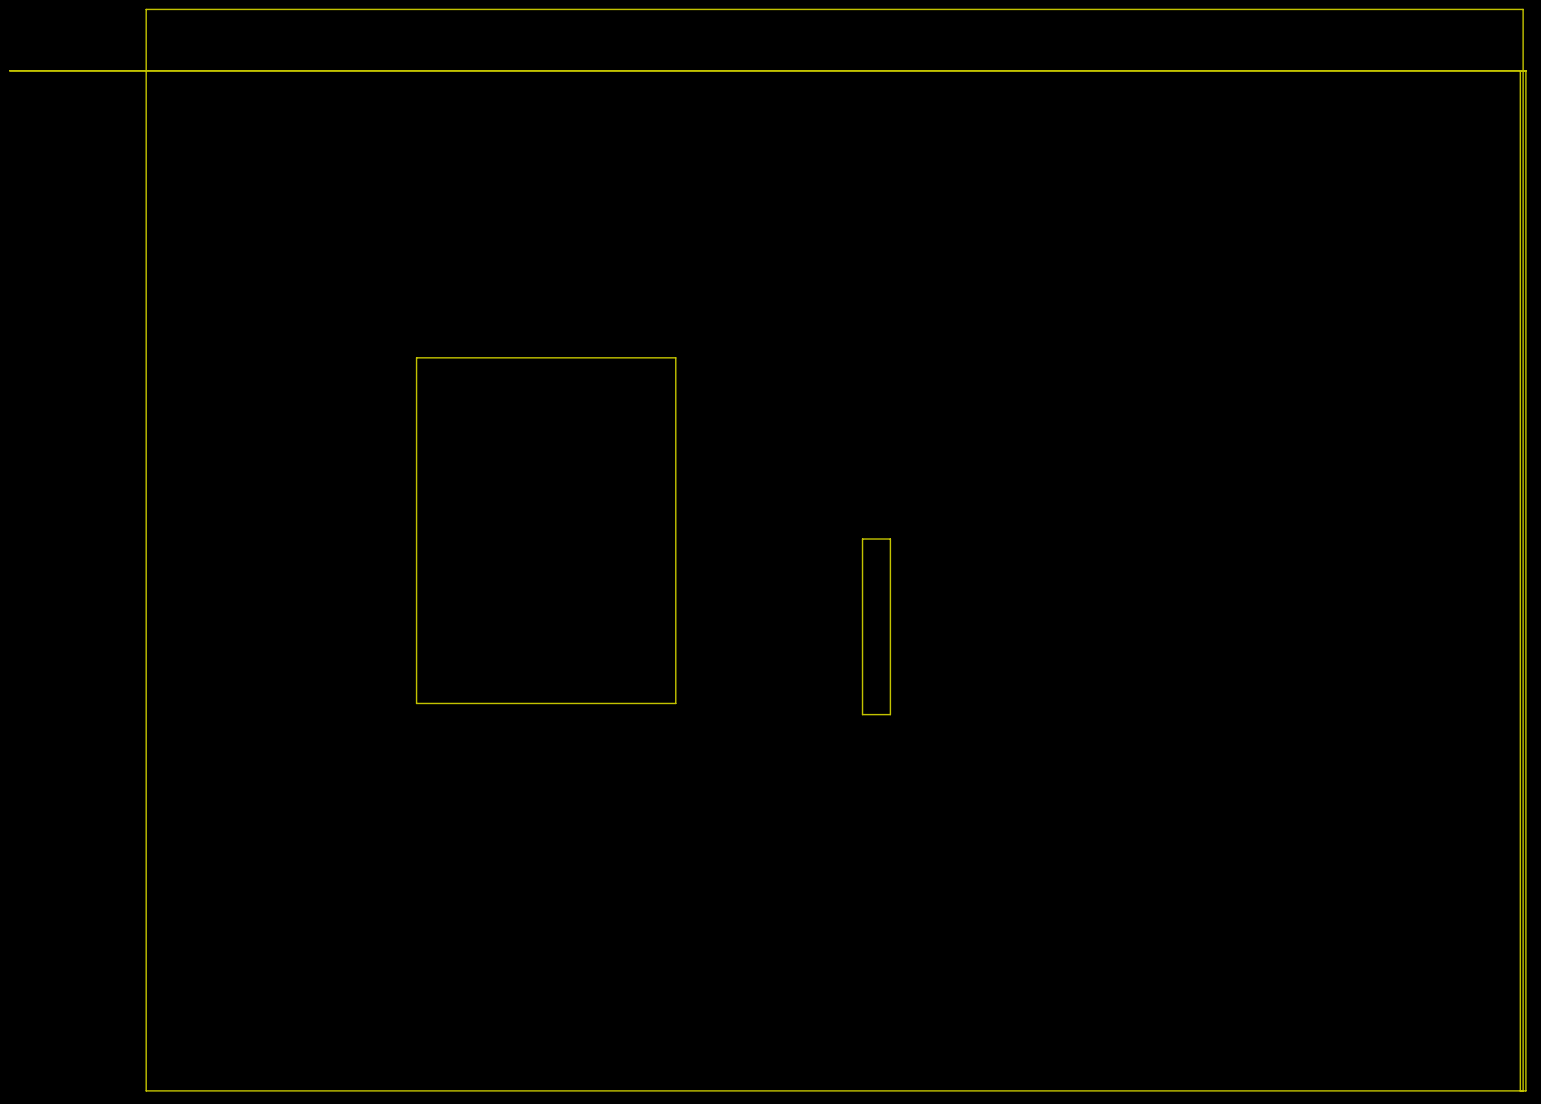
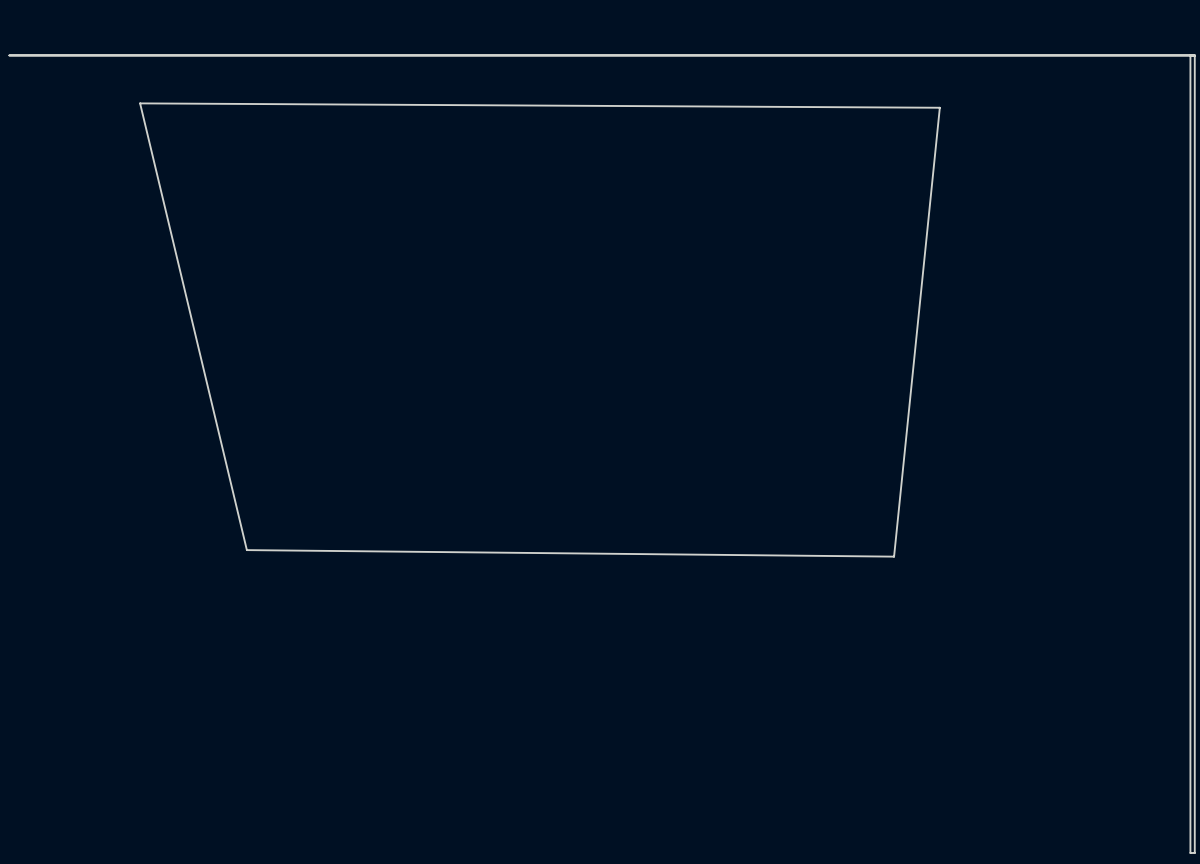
board edge: none -> (140, 103) (246, 550) (894, 556) (939, 107) (140, 103)
board edge: (416, 357) (675, 357) (675, 703) (416, 703) (416, 357) -> none
board edge: (862, 539) (890, 539) (890, 714) (862, 714) (862, 539) -> none
board edge: (1520, 1090) (146, 1090) (146, 9) (1523, 9) (1523, 1090) -> none

